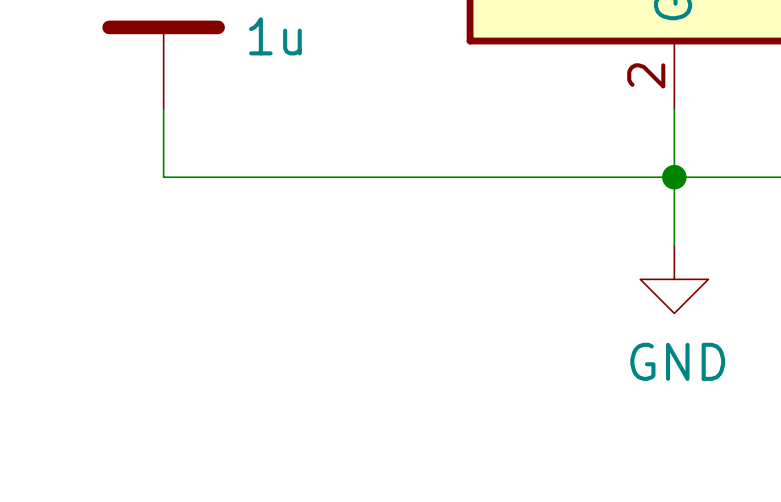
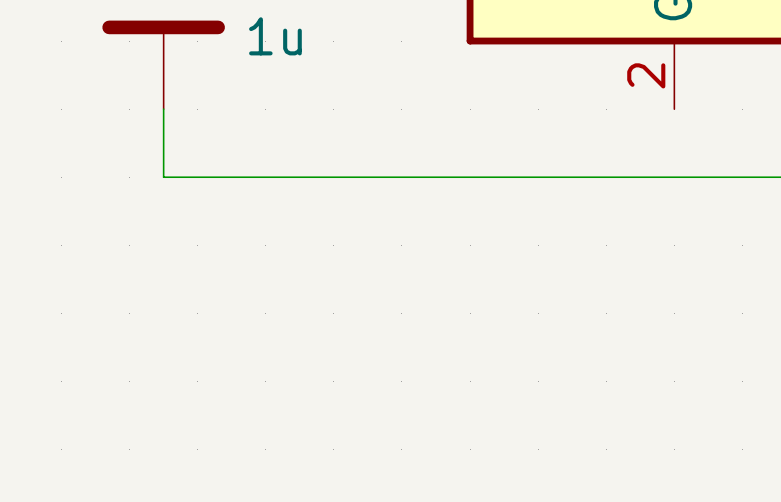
wire: (674, 109) (674, 245) -> none
junction: (674, 177) -> none
power symbol: GND (674, 279) -> none

